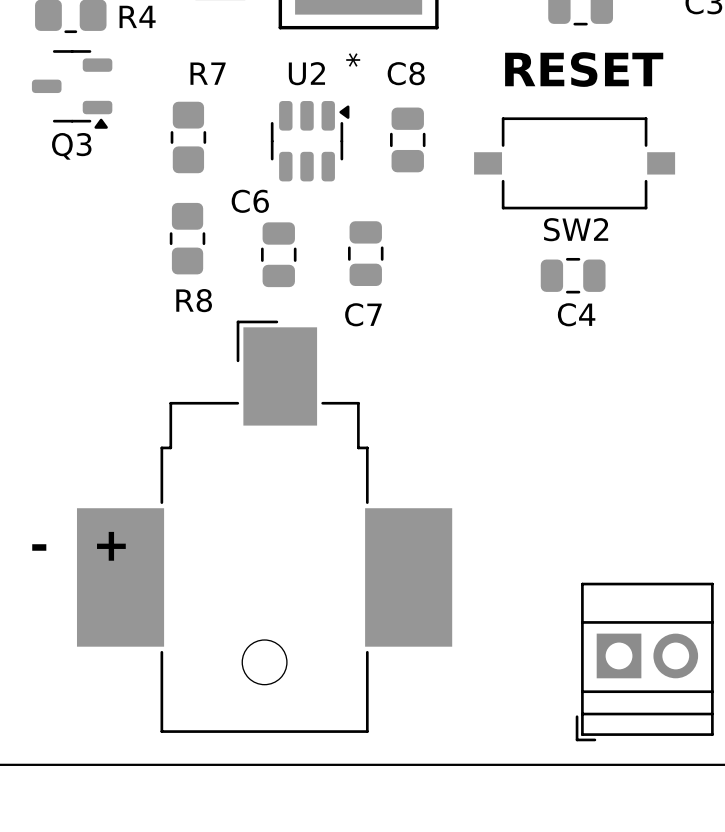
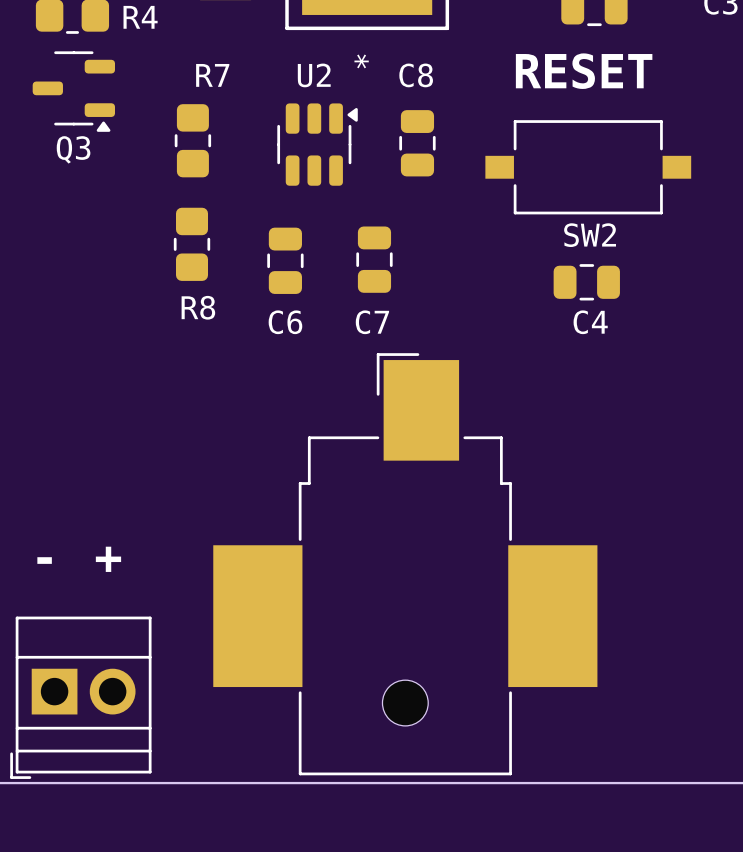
C6 name position: C6 (250, 201) -> C6 (285, 322)
part position: (264, 526) -> (405, 564)
part: (644, 661) -> none
part: none -> (80, 697)

